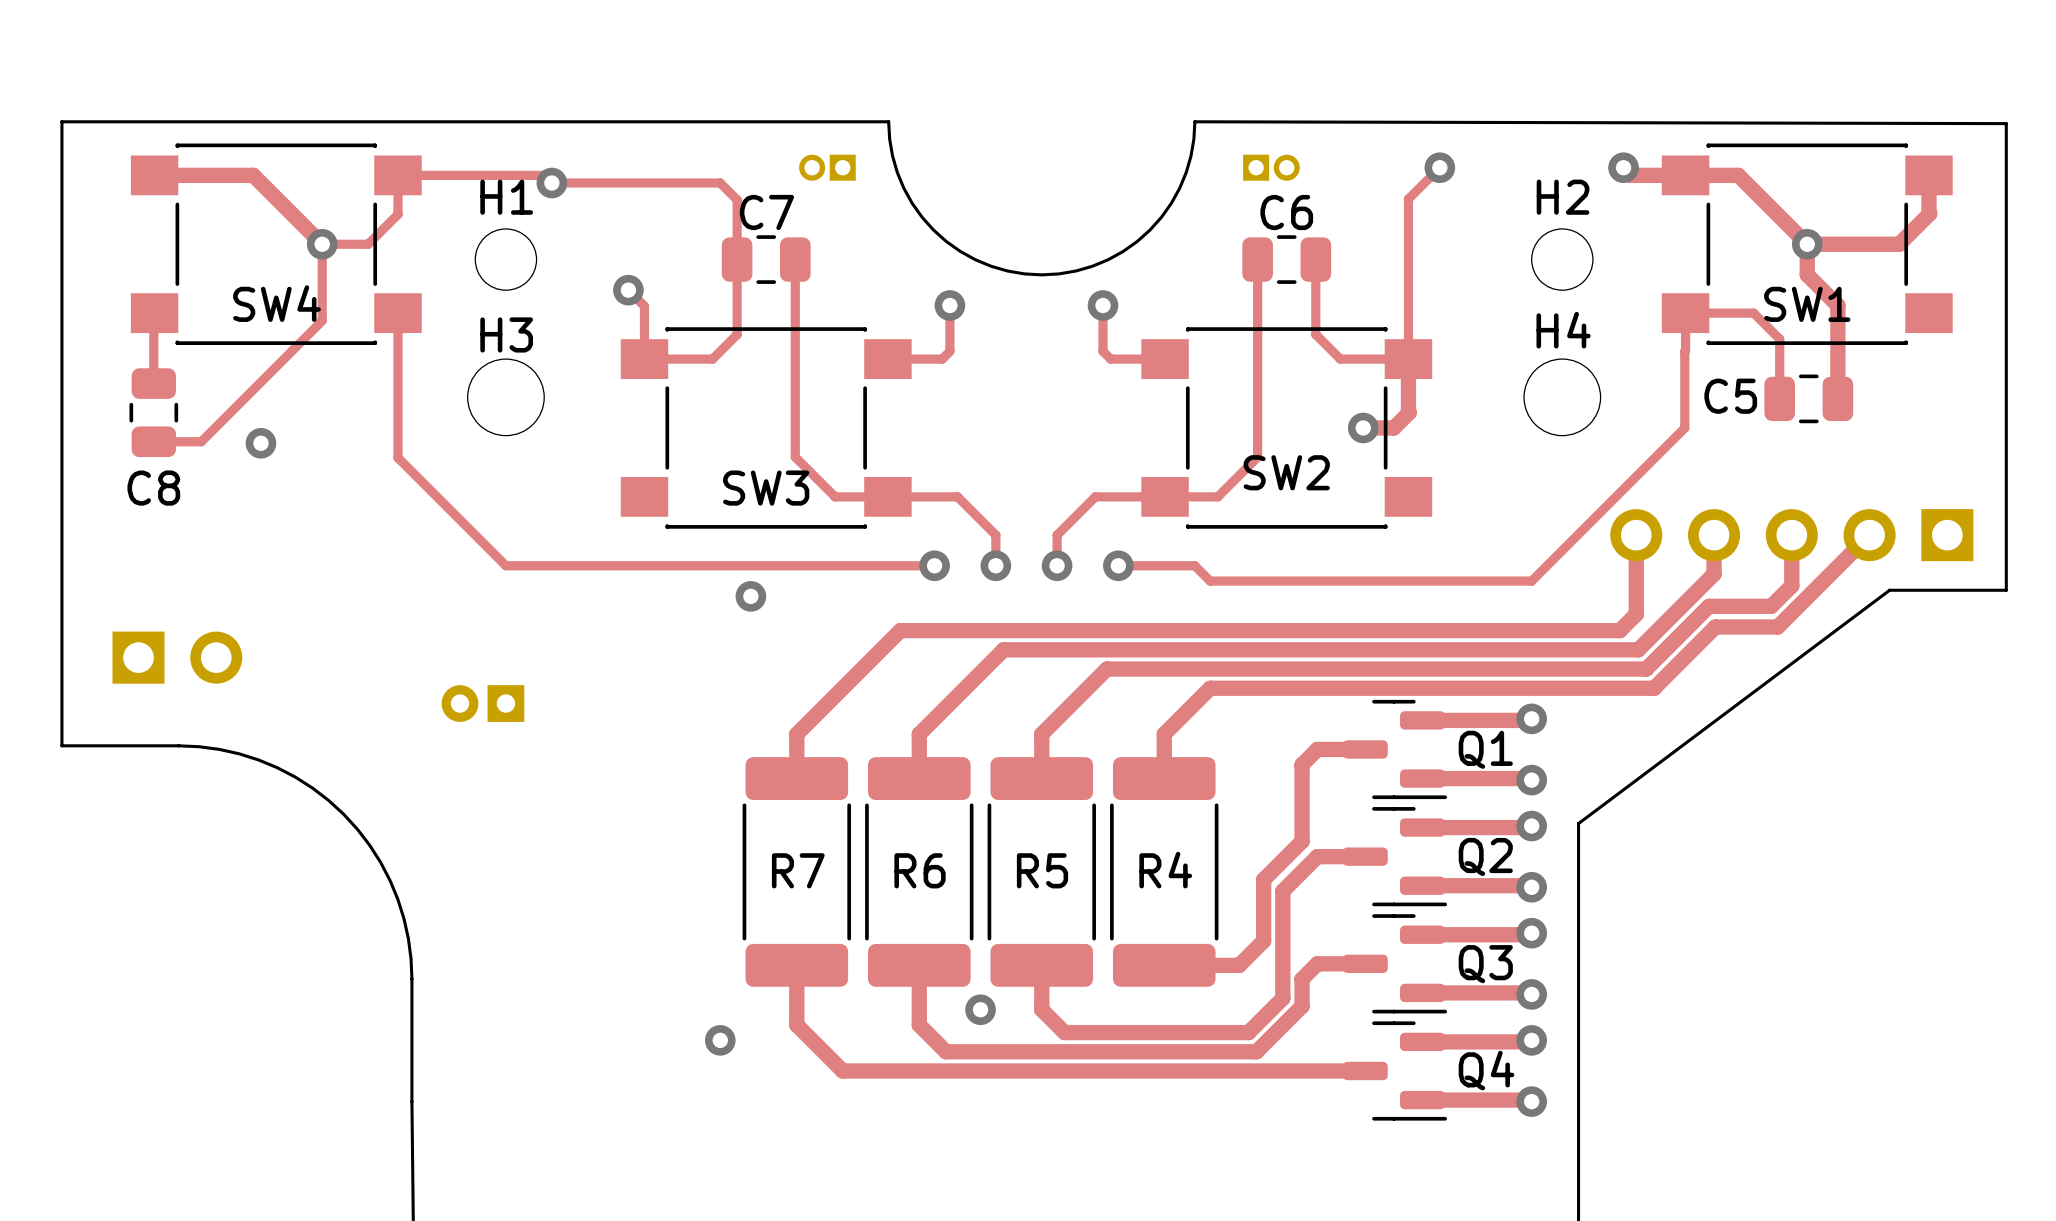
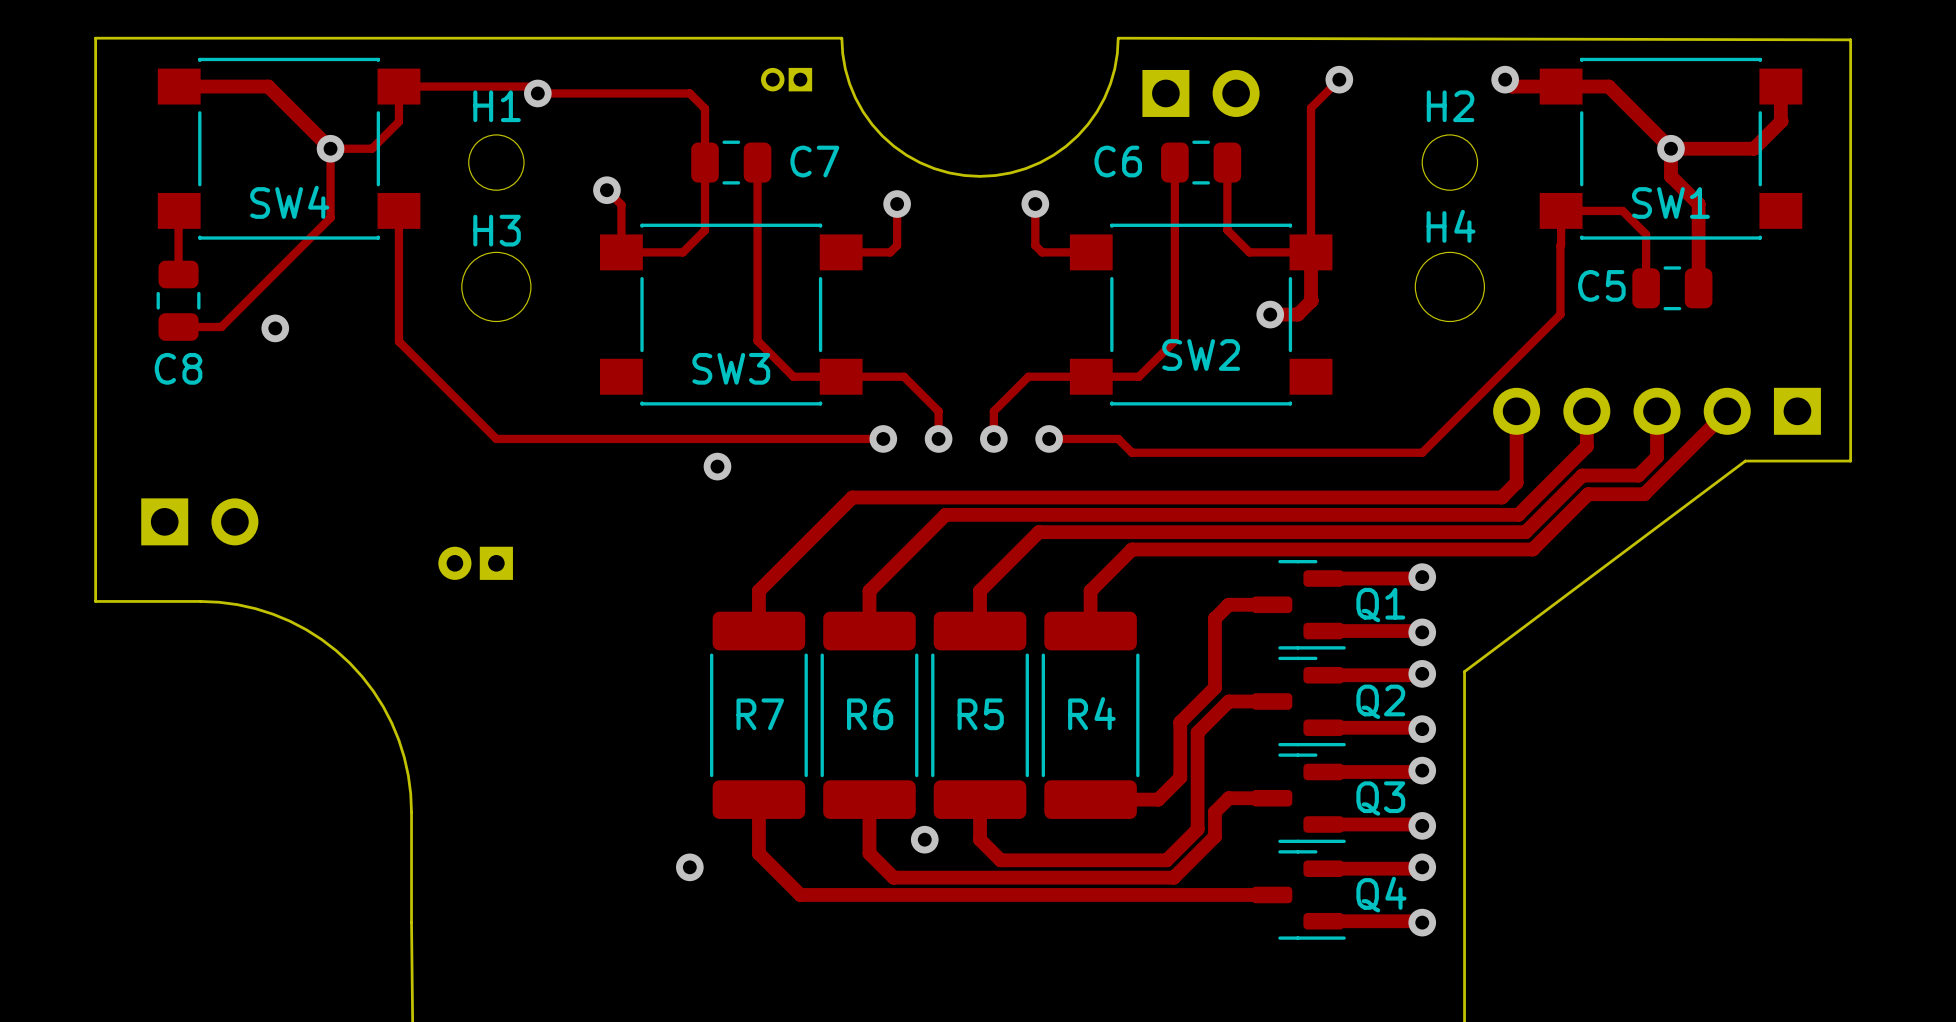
part footprint: [1243, 154, 1300, 181] -> [1142, 69, 1260, 117]
C7 name position: C7 (766, 212) -> C7 (814, 161)
C6 name position: C6 (1286, 212) -> C6 (1118, 161)

